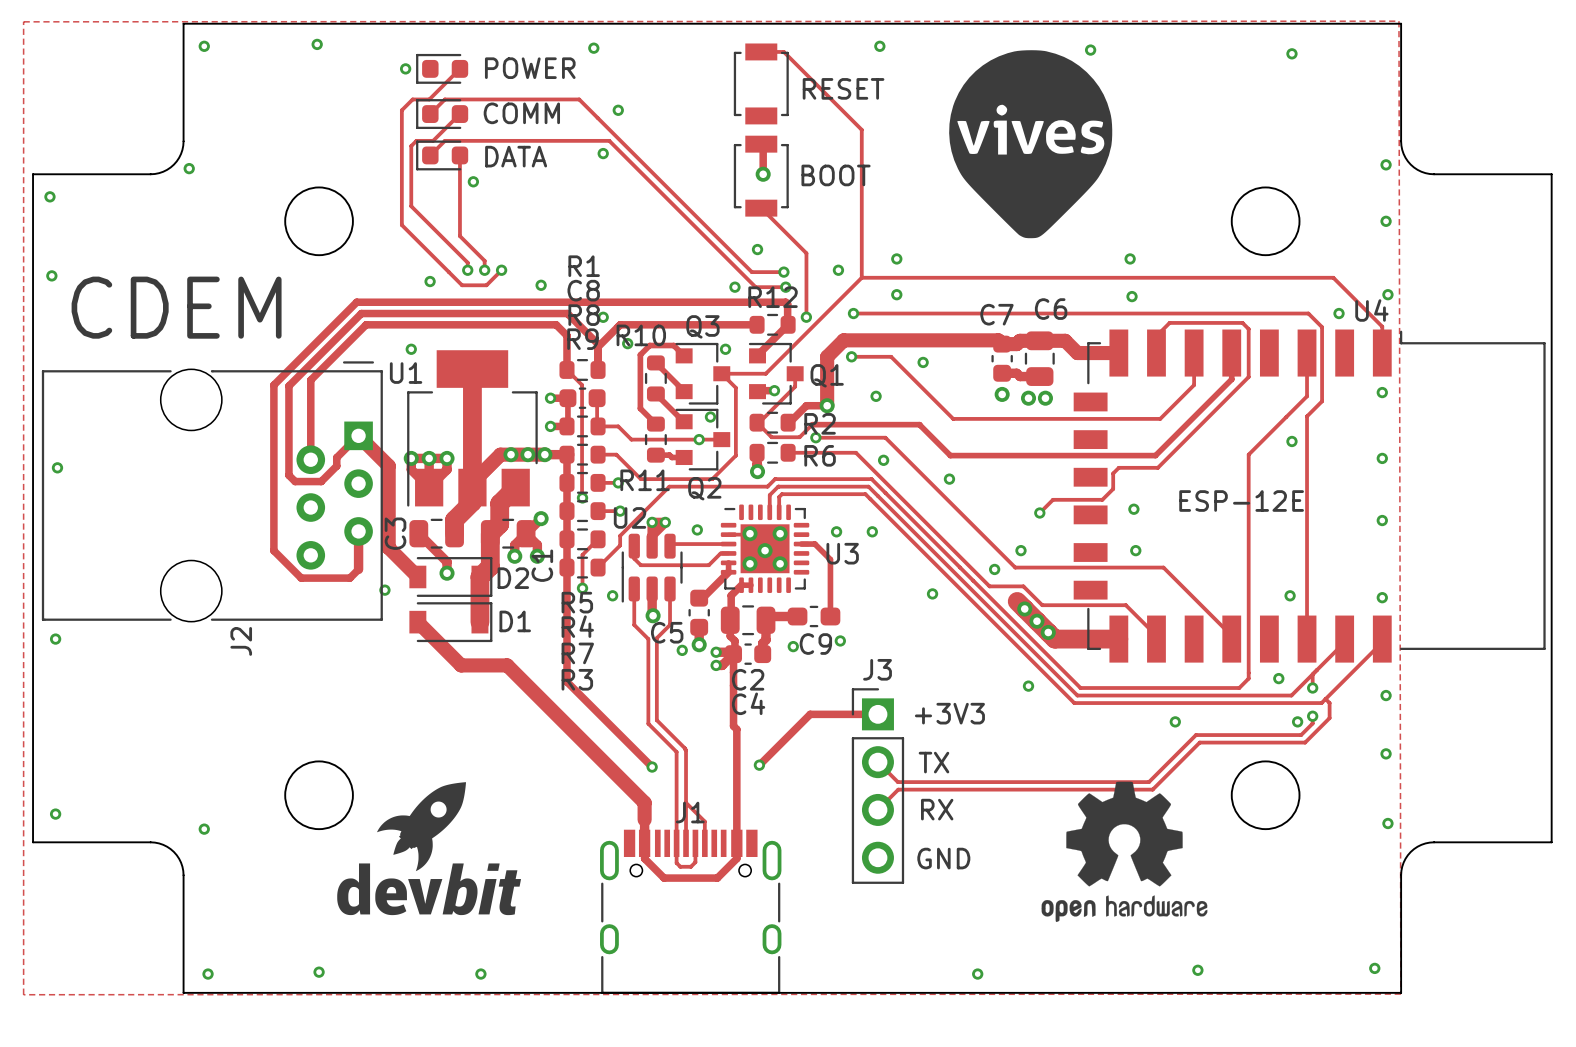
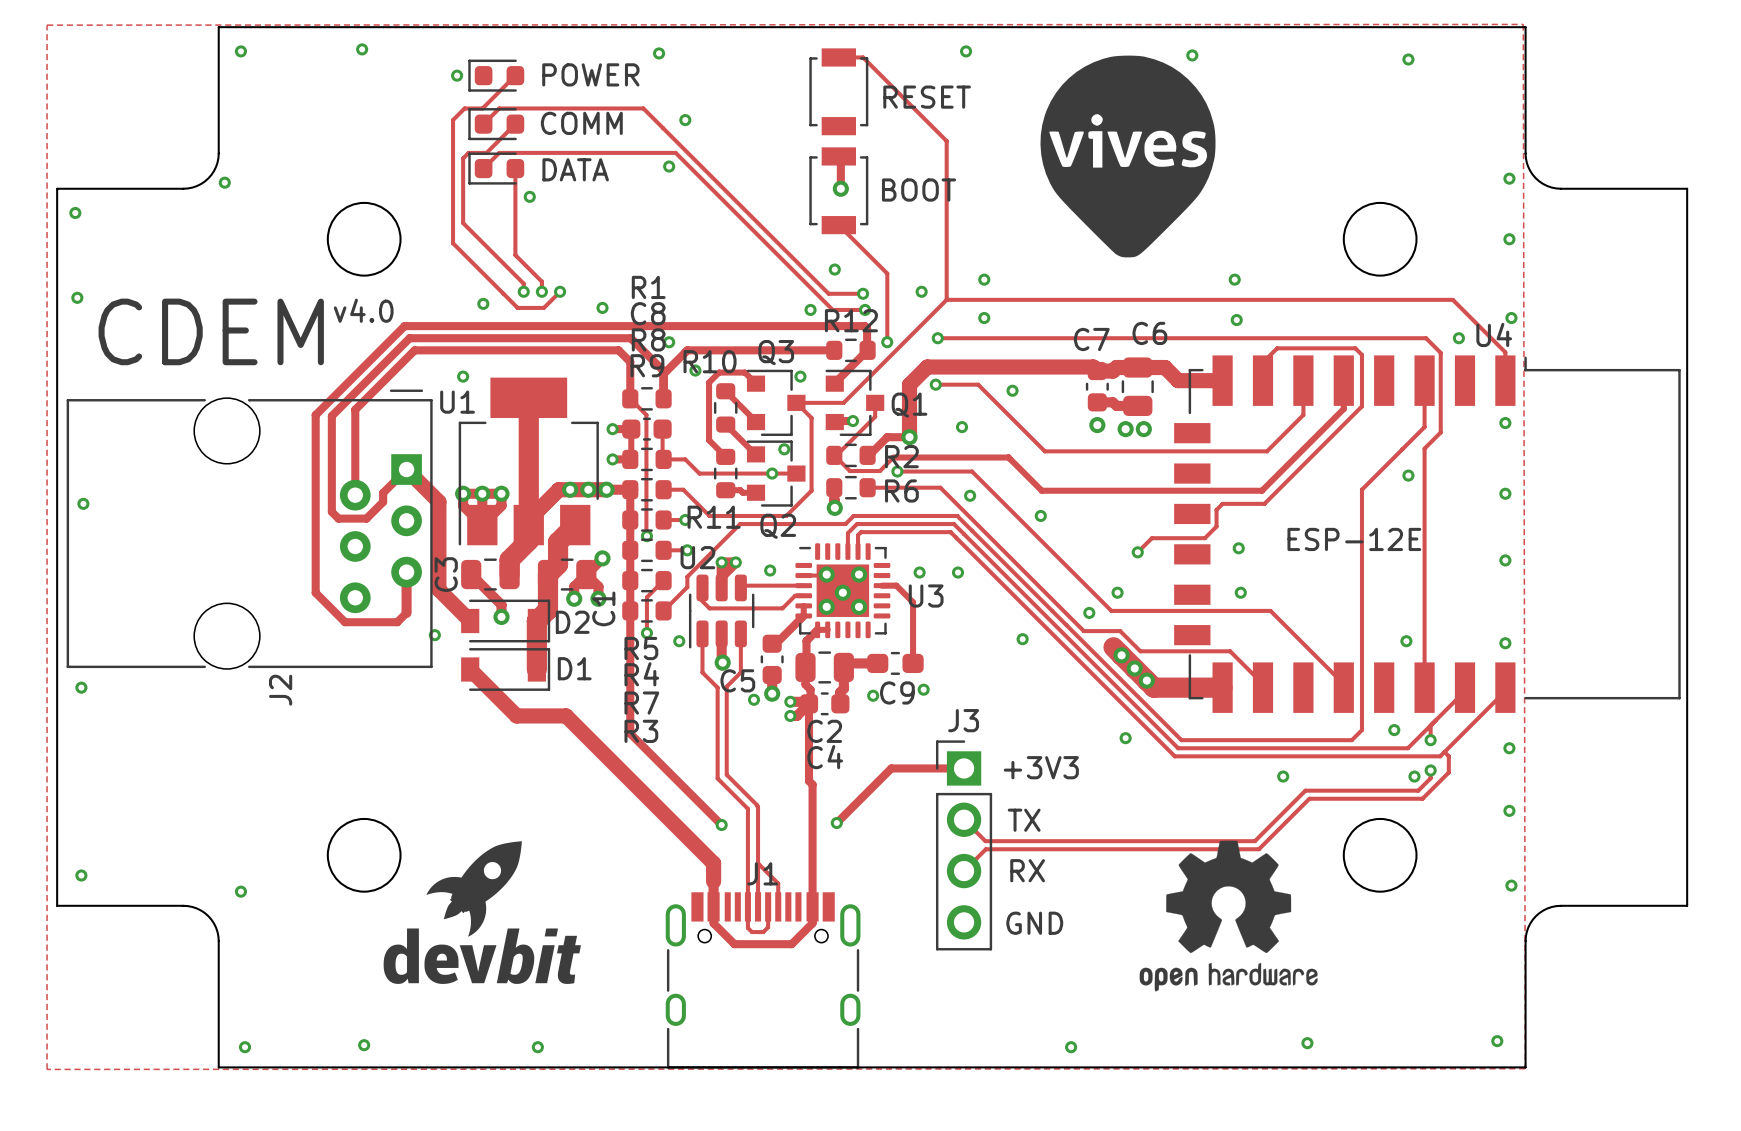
text: none -> v4.0 (363, 310)

